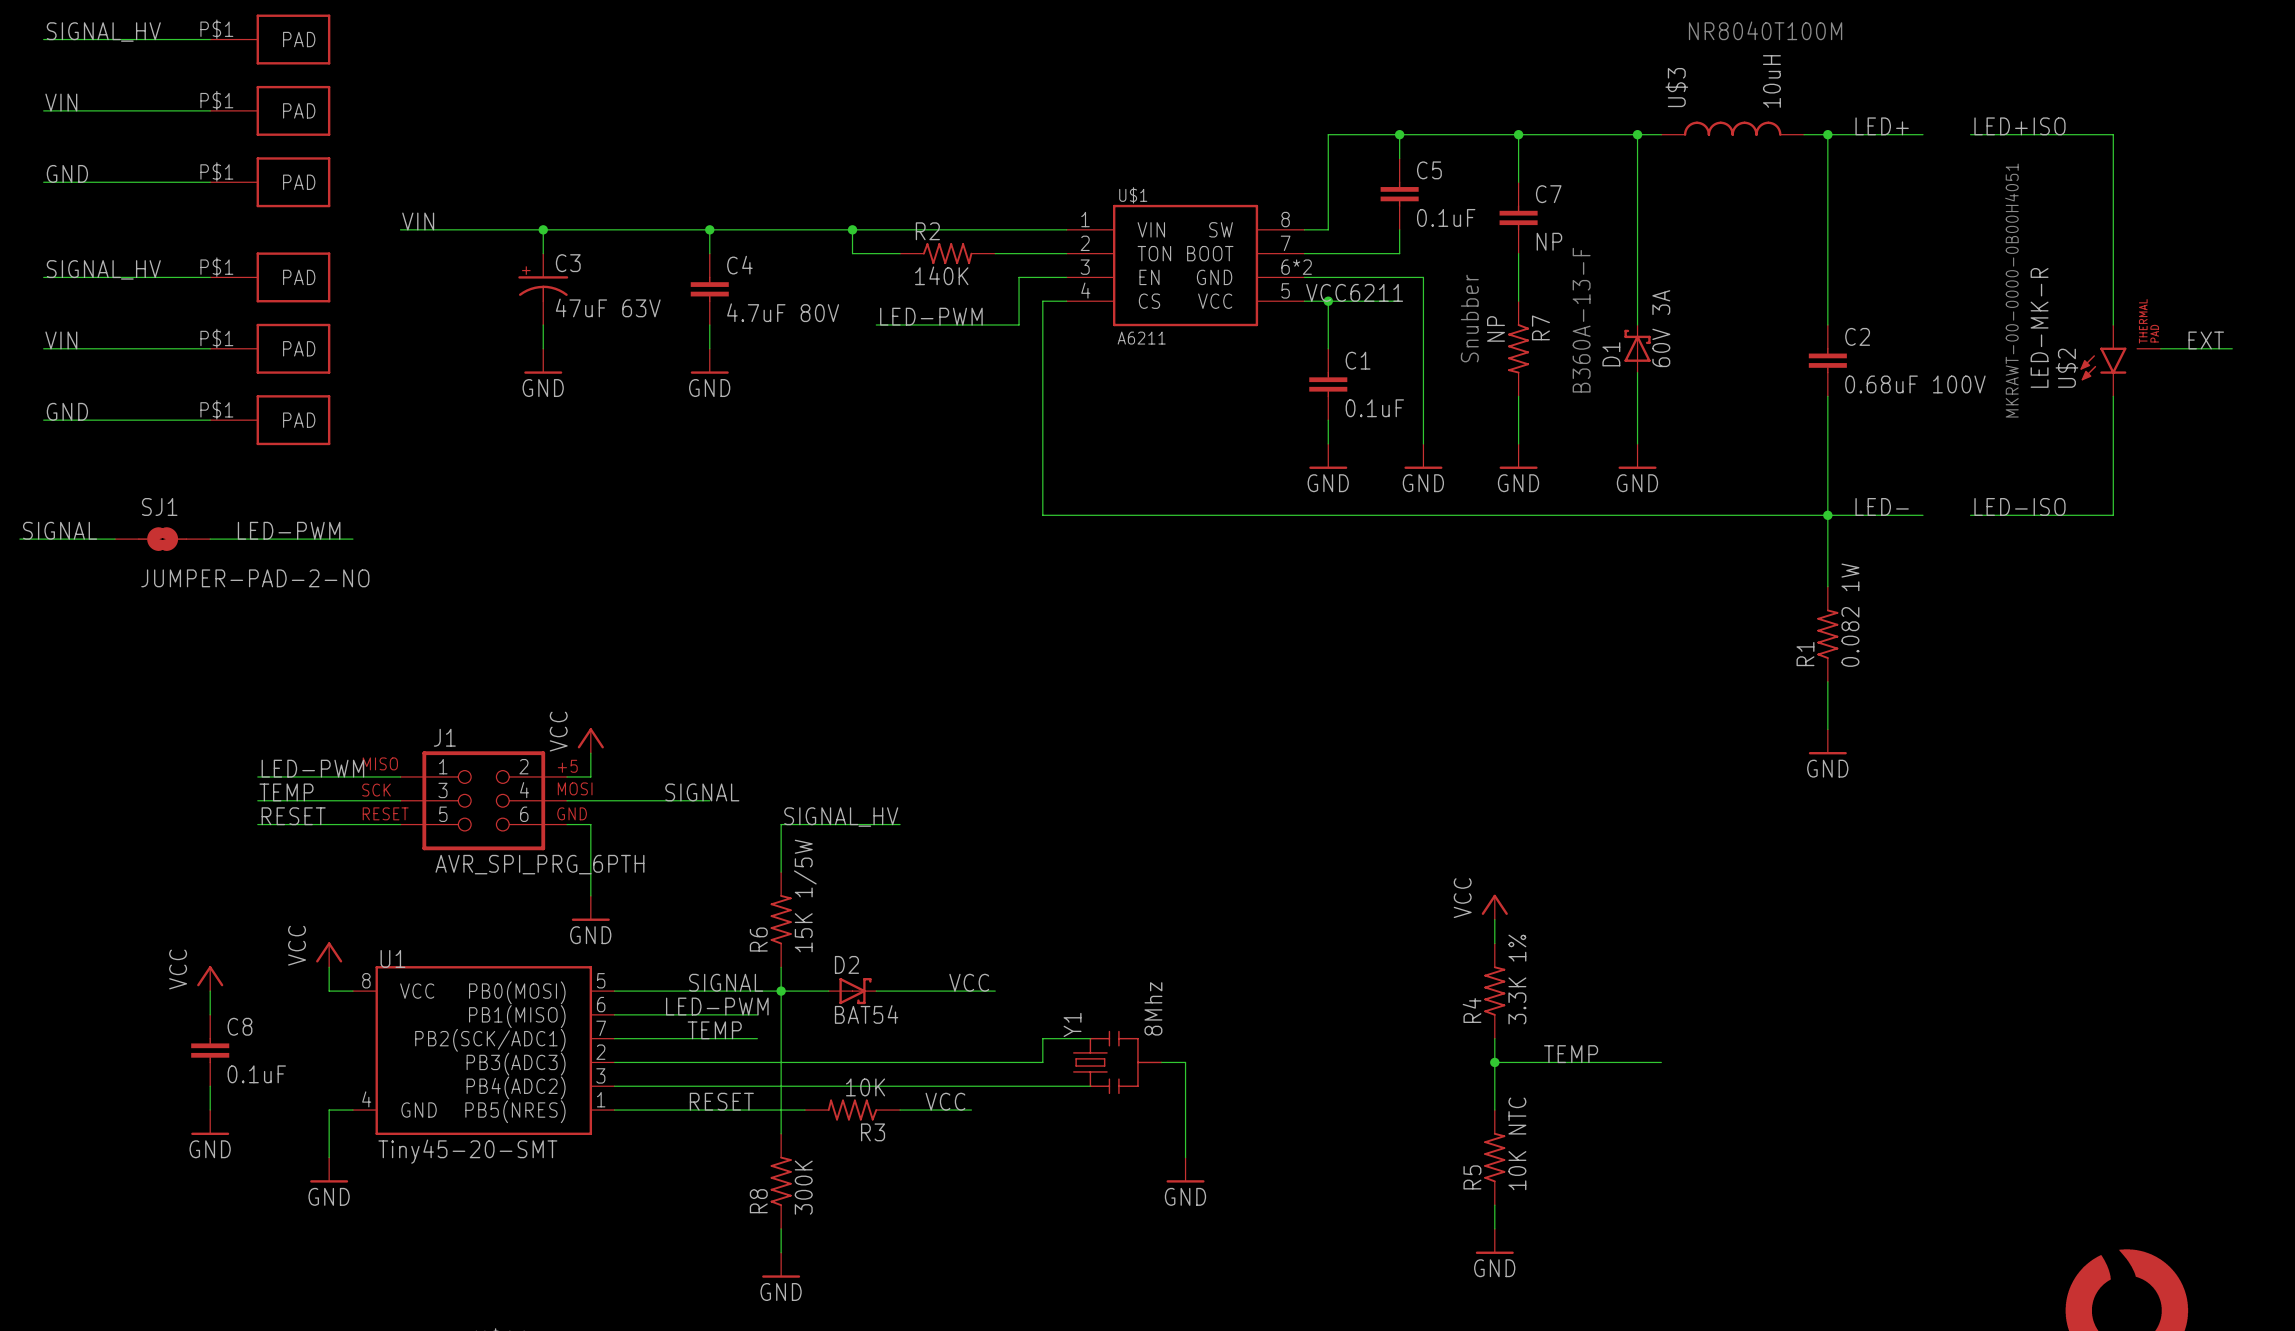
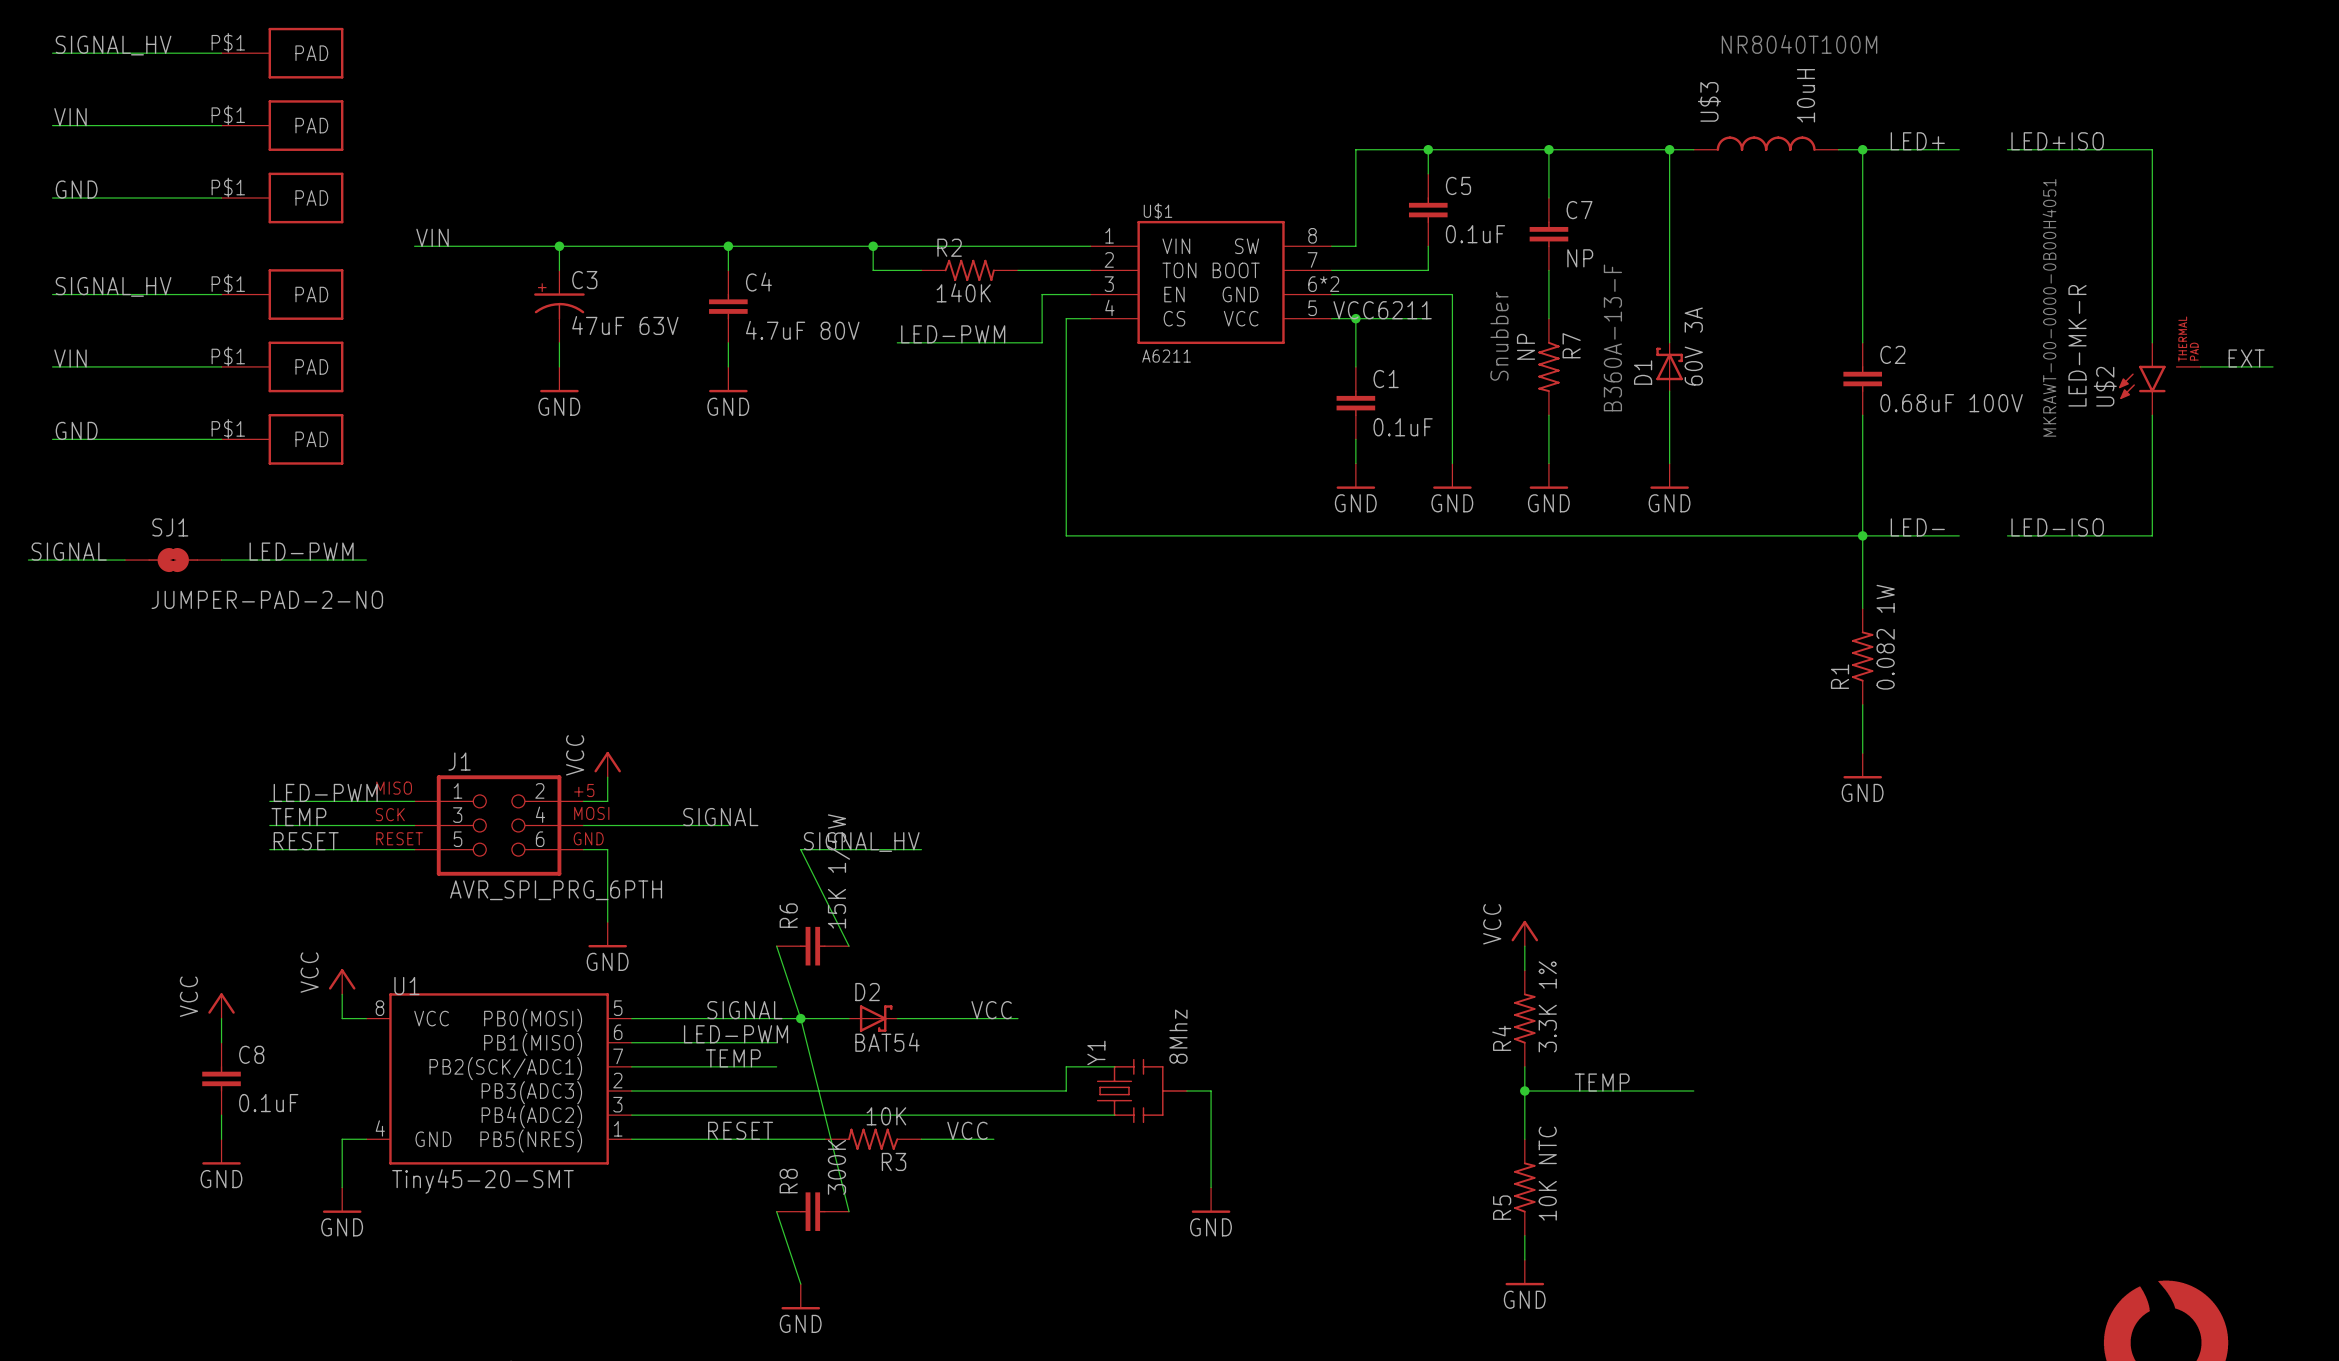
wire: (781, 824) (781, 872) -> (800, 849) (849, 946)
R6 symbol: [770, 872, 792, 968] -> [776, 926, 850, 966]
R6 value position: 15K 1/5W (805, 896) -> 15K 1/5W (838, 871)
wire: none -> (776, 946) (800, 1018) (849, 1211)
R6 name position: R6 (758, 939) -> R6 (788, 915)
wire: (781, 967) (781, 1133) -> none
R8 symbol: [770, 1133, 792, 1229] -> [776, 1192, 850, 1231]
R8 value position: 300K (803, 1187) -> 300K (836, 1167)
R8 name position: R8 (758, 1201) -> R8 (788, 1181)
wire: (781, 1228) (781, 1252) -> (776, 1211) (800, 1284)

